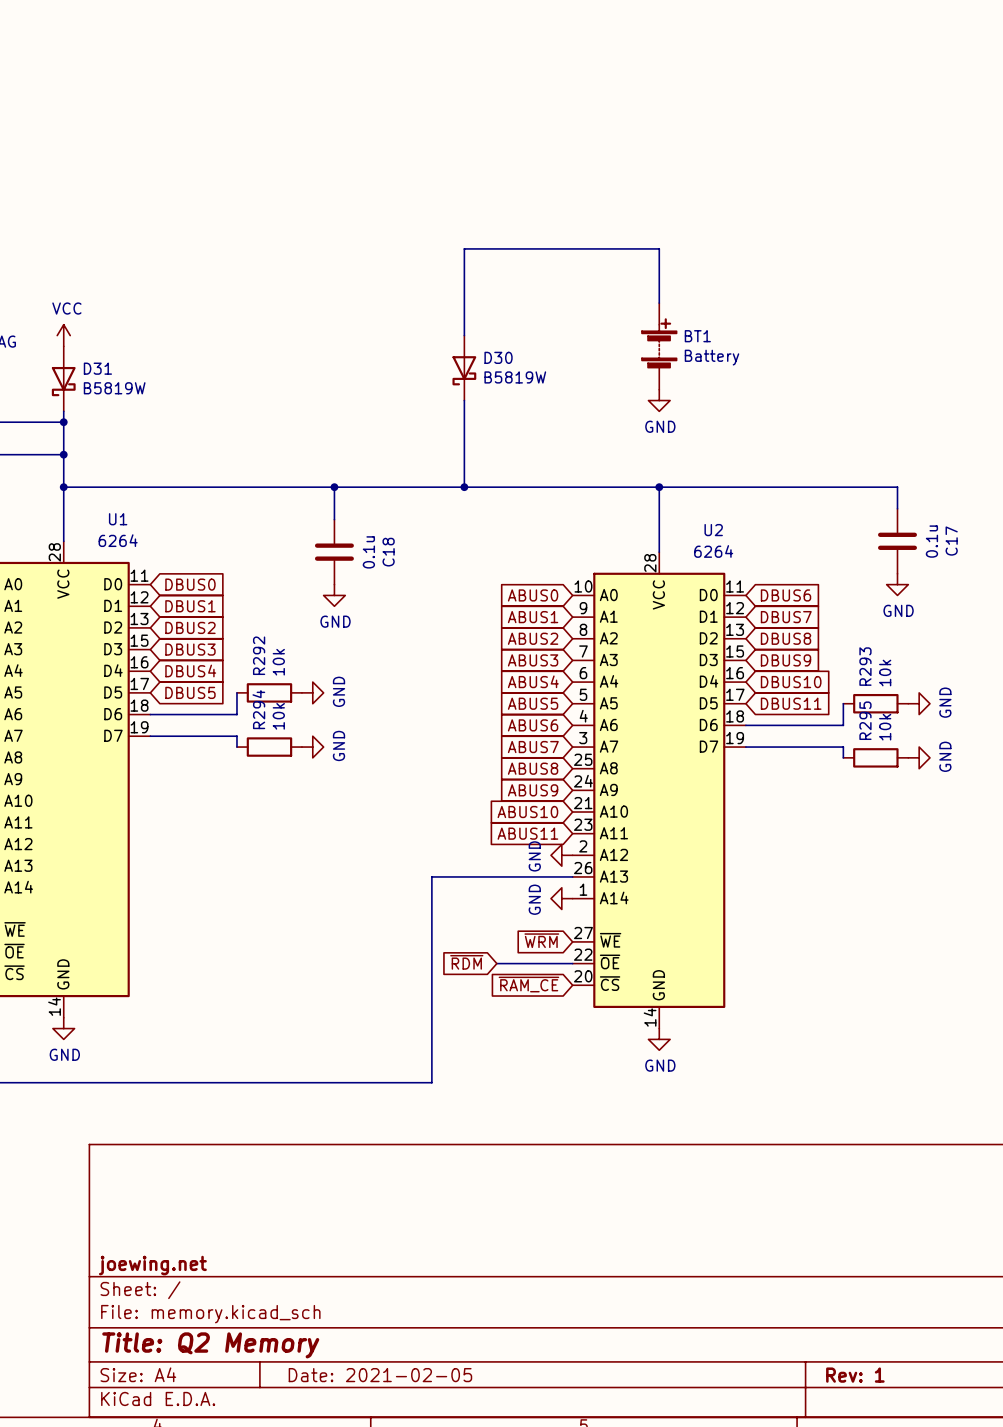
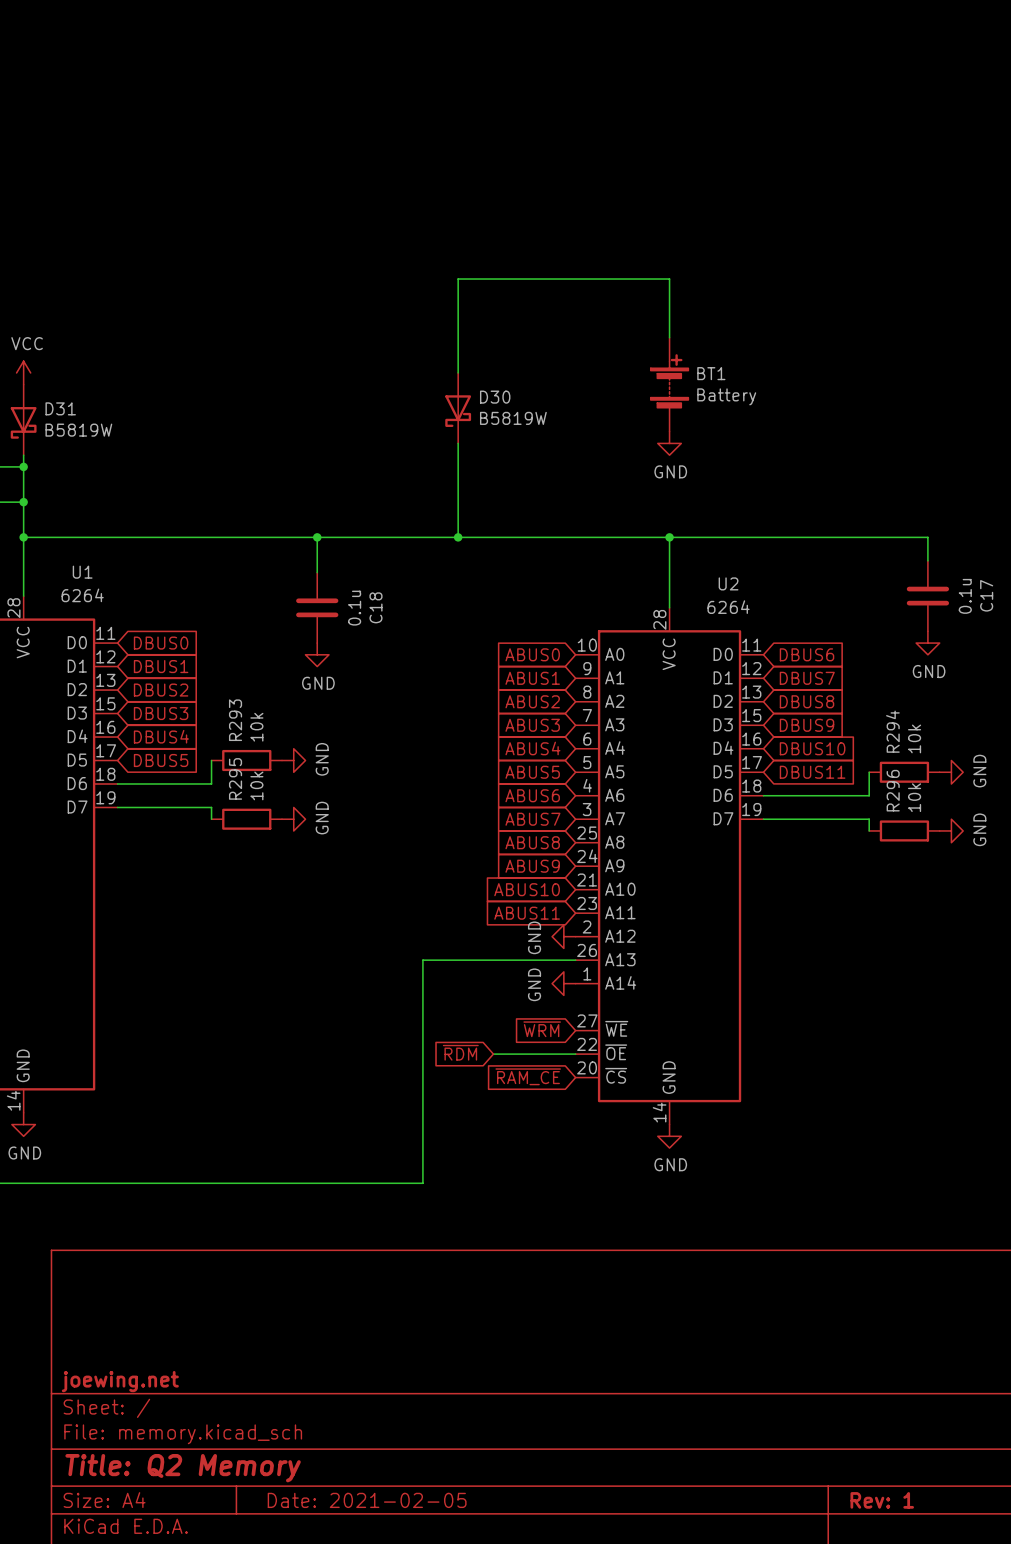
R292 name: R292 (259, 655) -> R293 (235, 720)
R293 name: R293 (865, 666) -> R294 (892, 731)
R294 name: R294 (258, 709) -> R295 (235, 778)
R295 name: R295 (865, 720) -> R296 (893, 790)

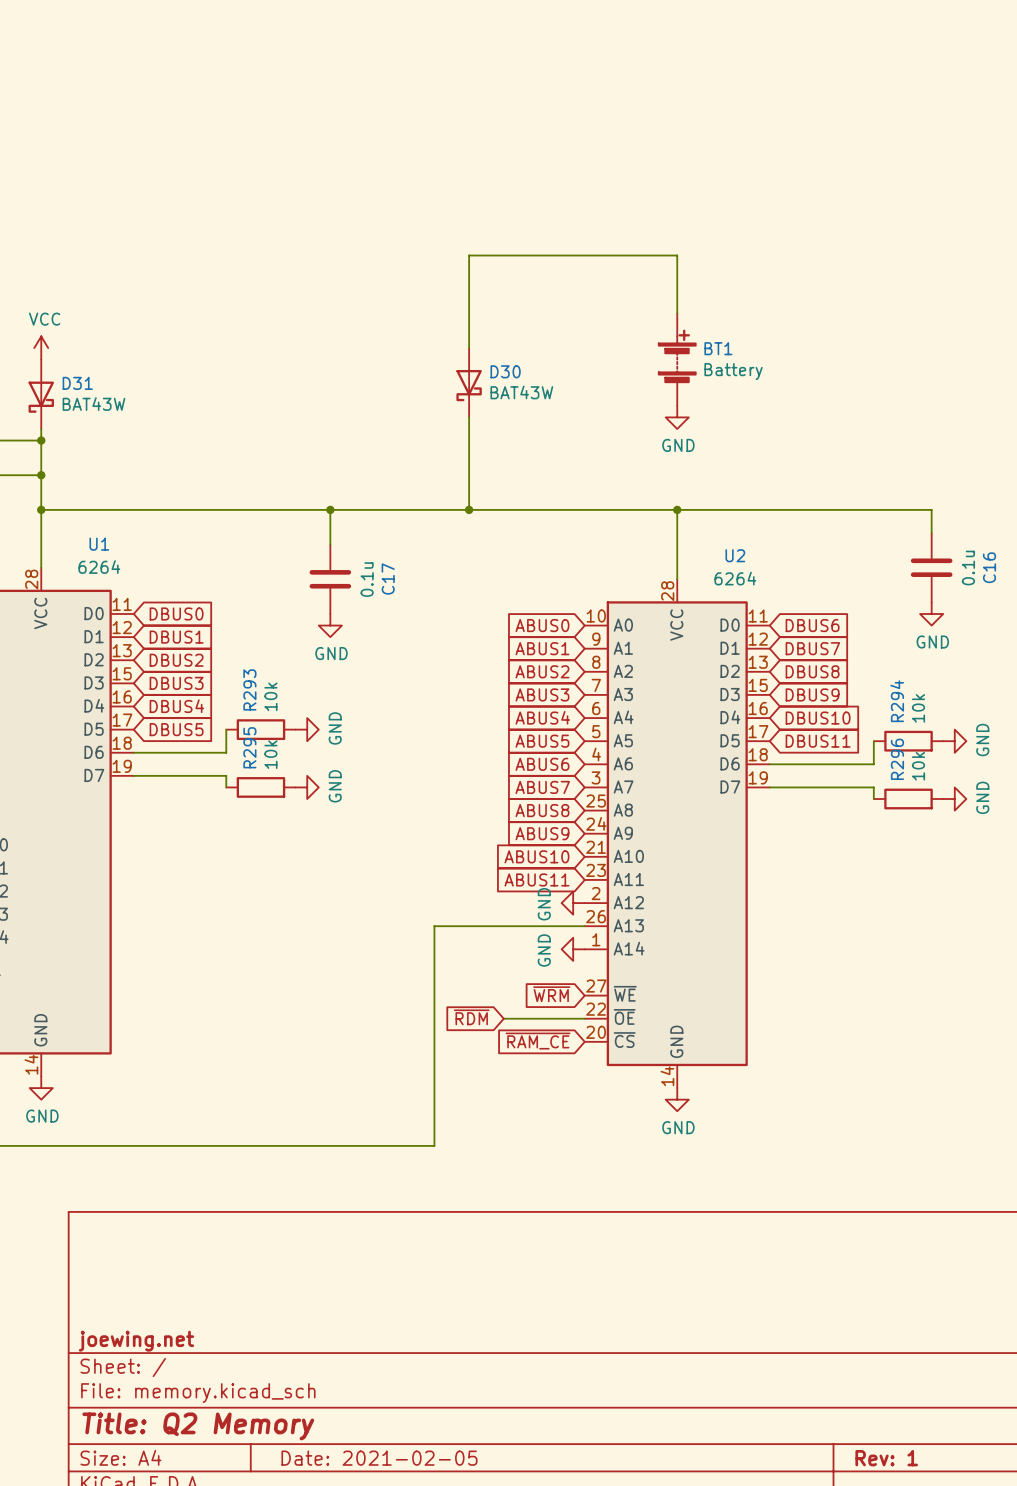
D30 value: B5819W (513, 418) -> BAT43W (521, 392)
D31 value: B5819W (78, 430) -> BAT43W (93, 404)
C17 name: C17 (986, 595) -> C16 (989, 567)
C18 name: C18 (375, 607) -> C17 (388, 579)

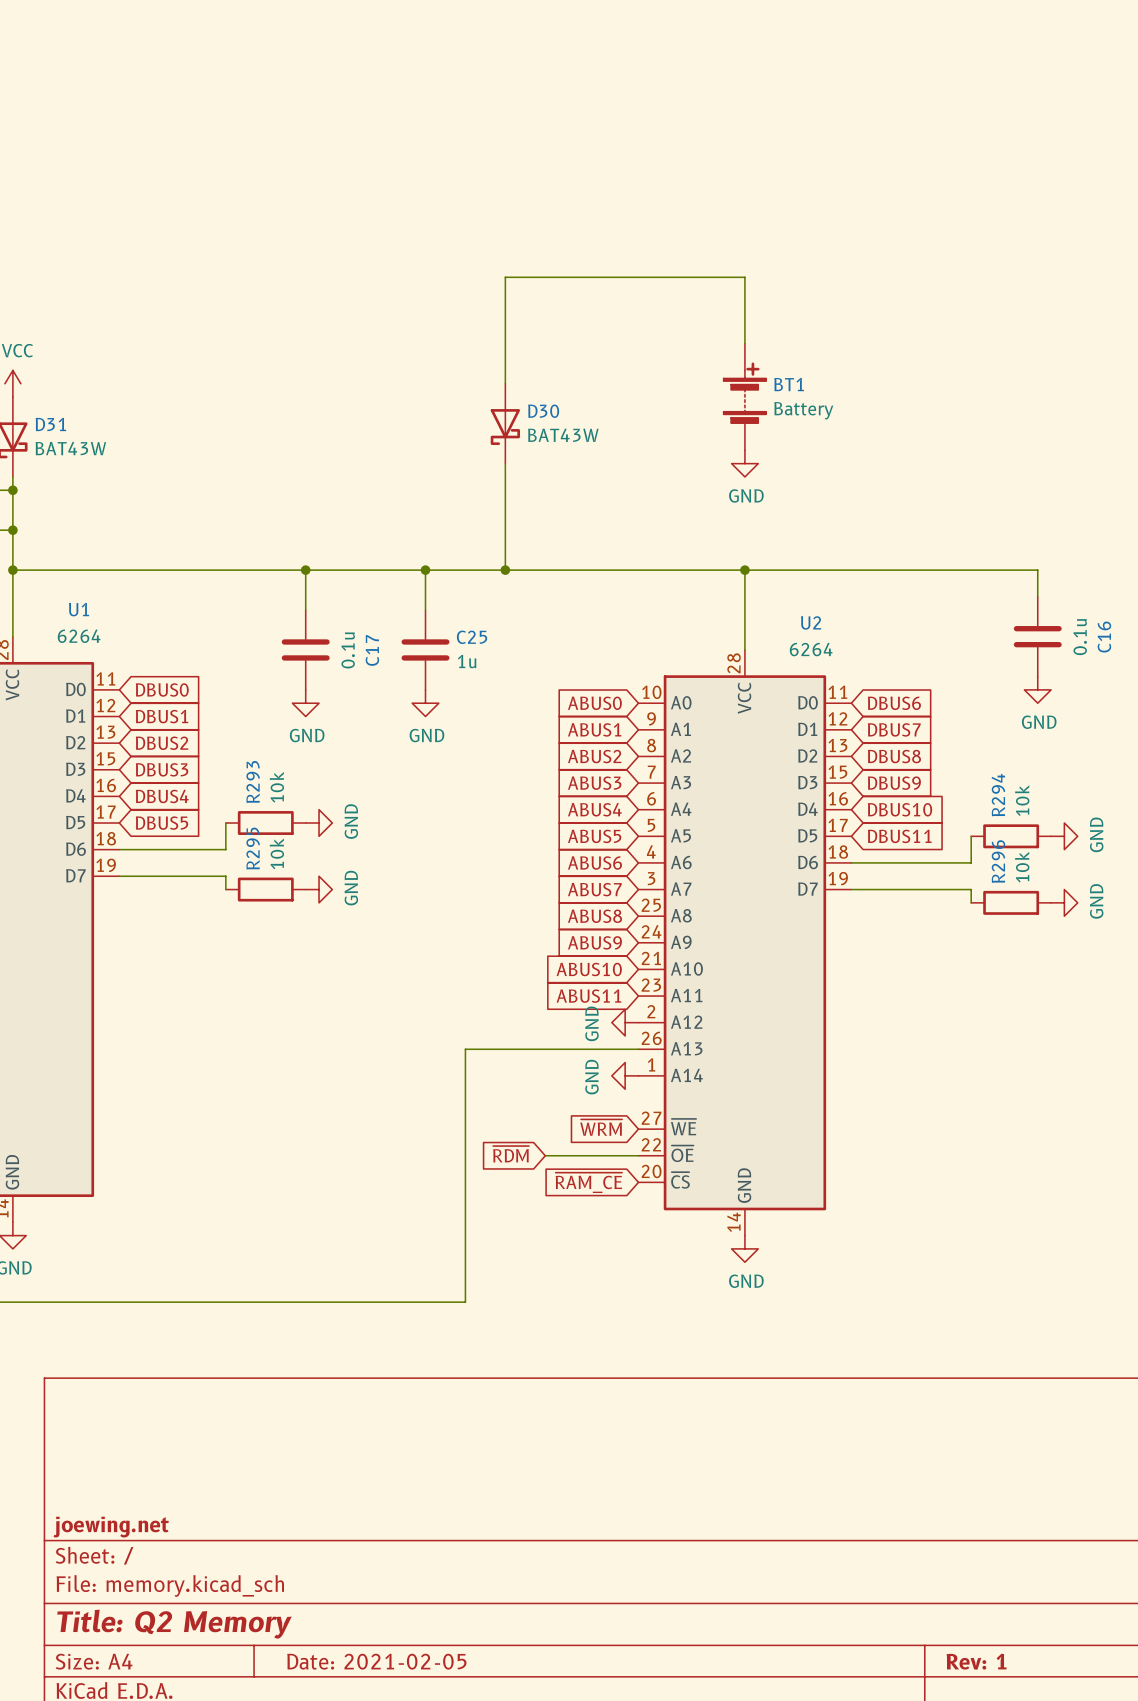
junction: none -> (305, 570)
wire: (330, 509) (330, 544) -> (305, 570) (305, 610)
junction: (330, 509) -> none
wire: none -> (425, 570) (425, 610)
junction: none -> (425, 570)
C17 position: (330, 579) -> (305, 649)
C25: none -> 1u (425, 649)
power symbol: none -> GND (305, 703)
power symbol: GND (330, 625) -> none
power symbol: none -> GND (425, 703)

